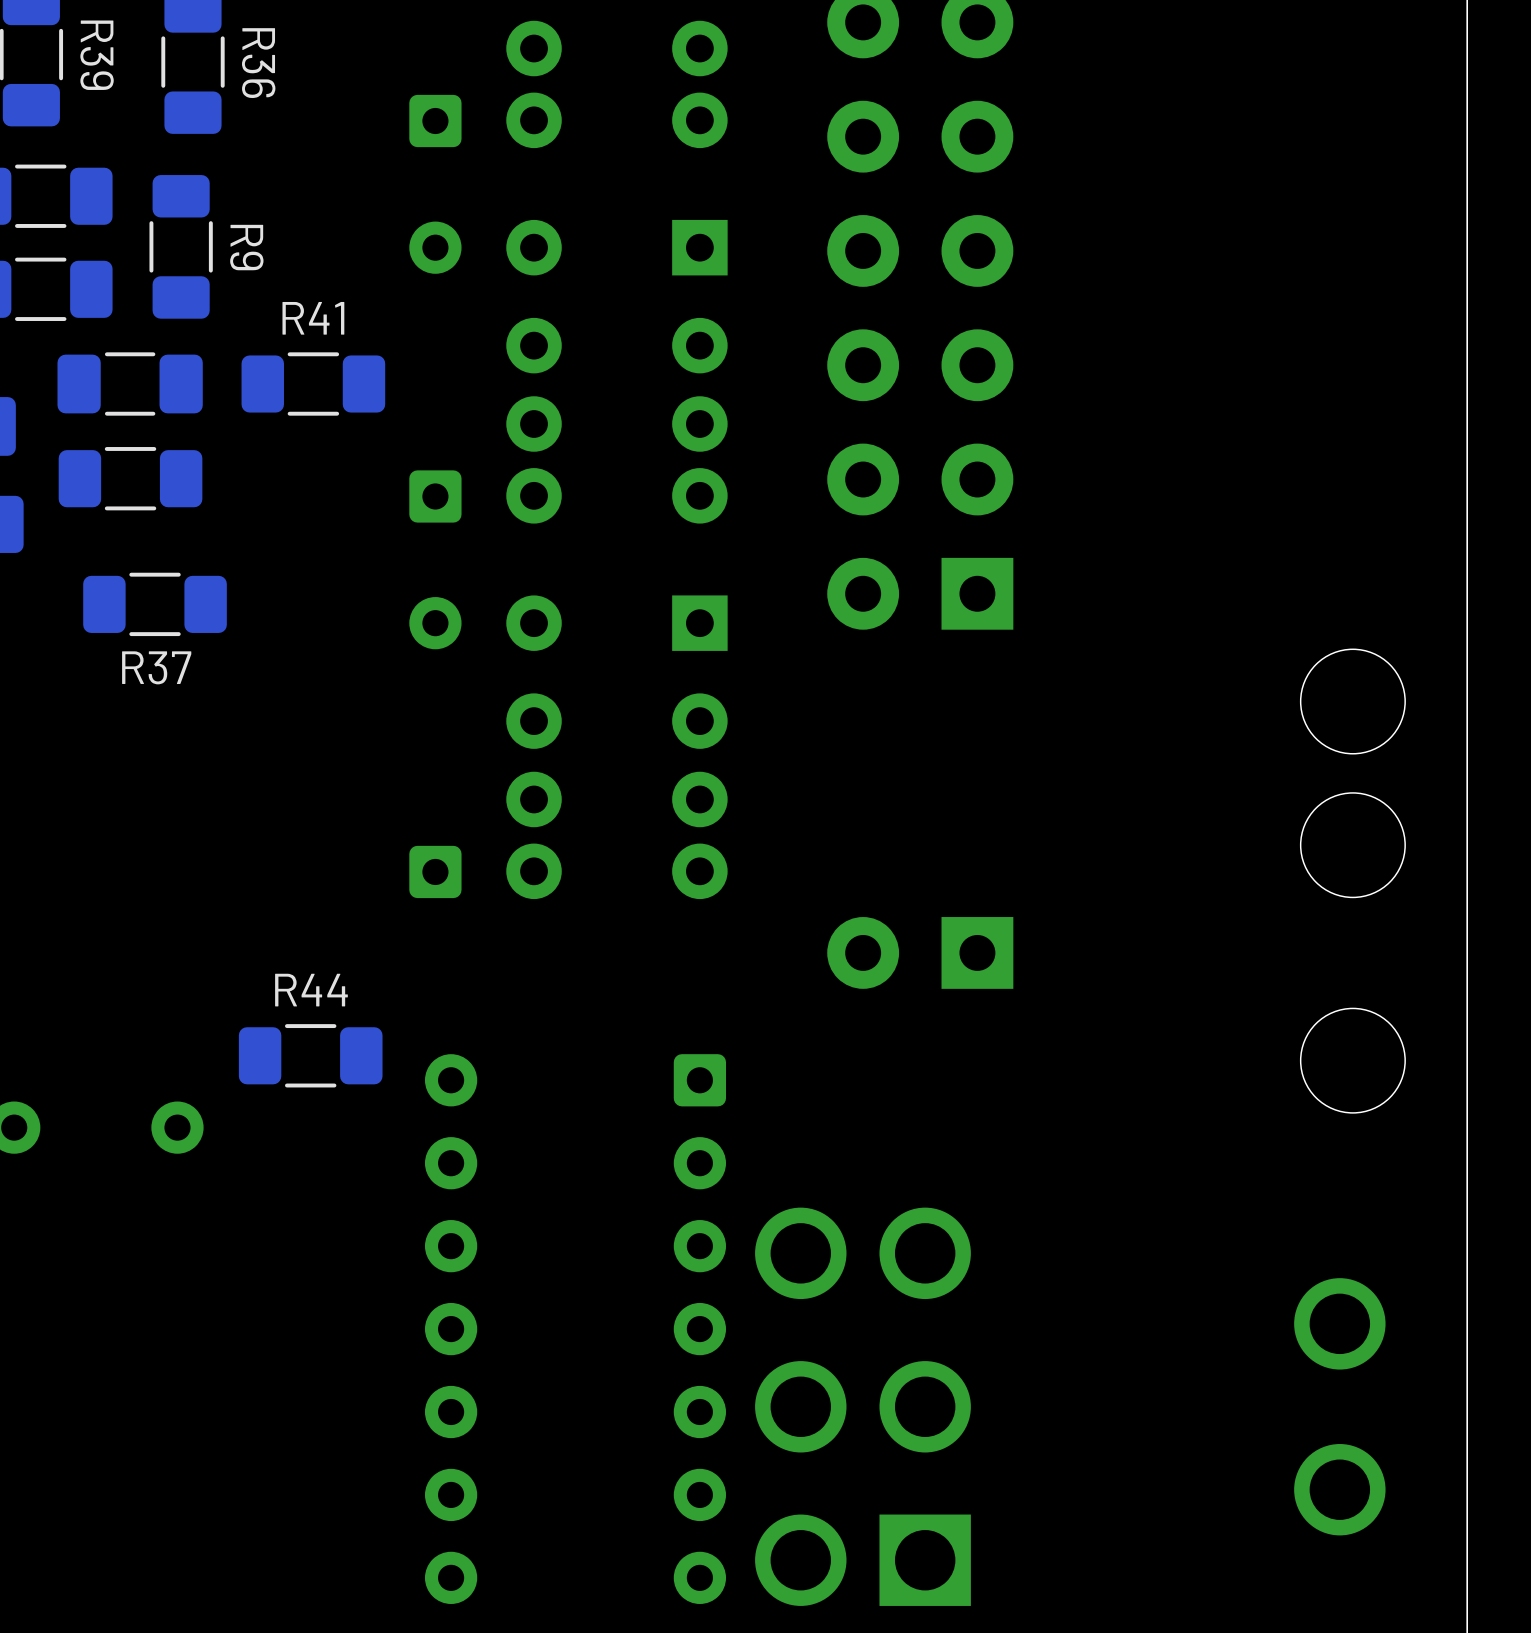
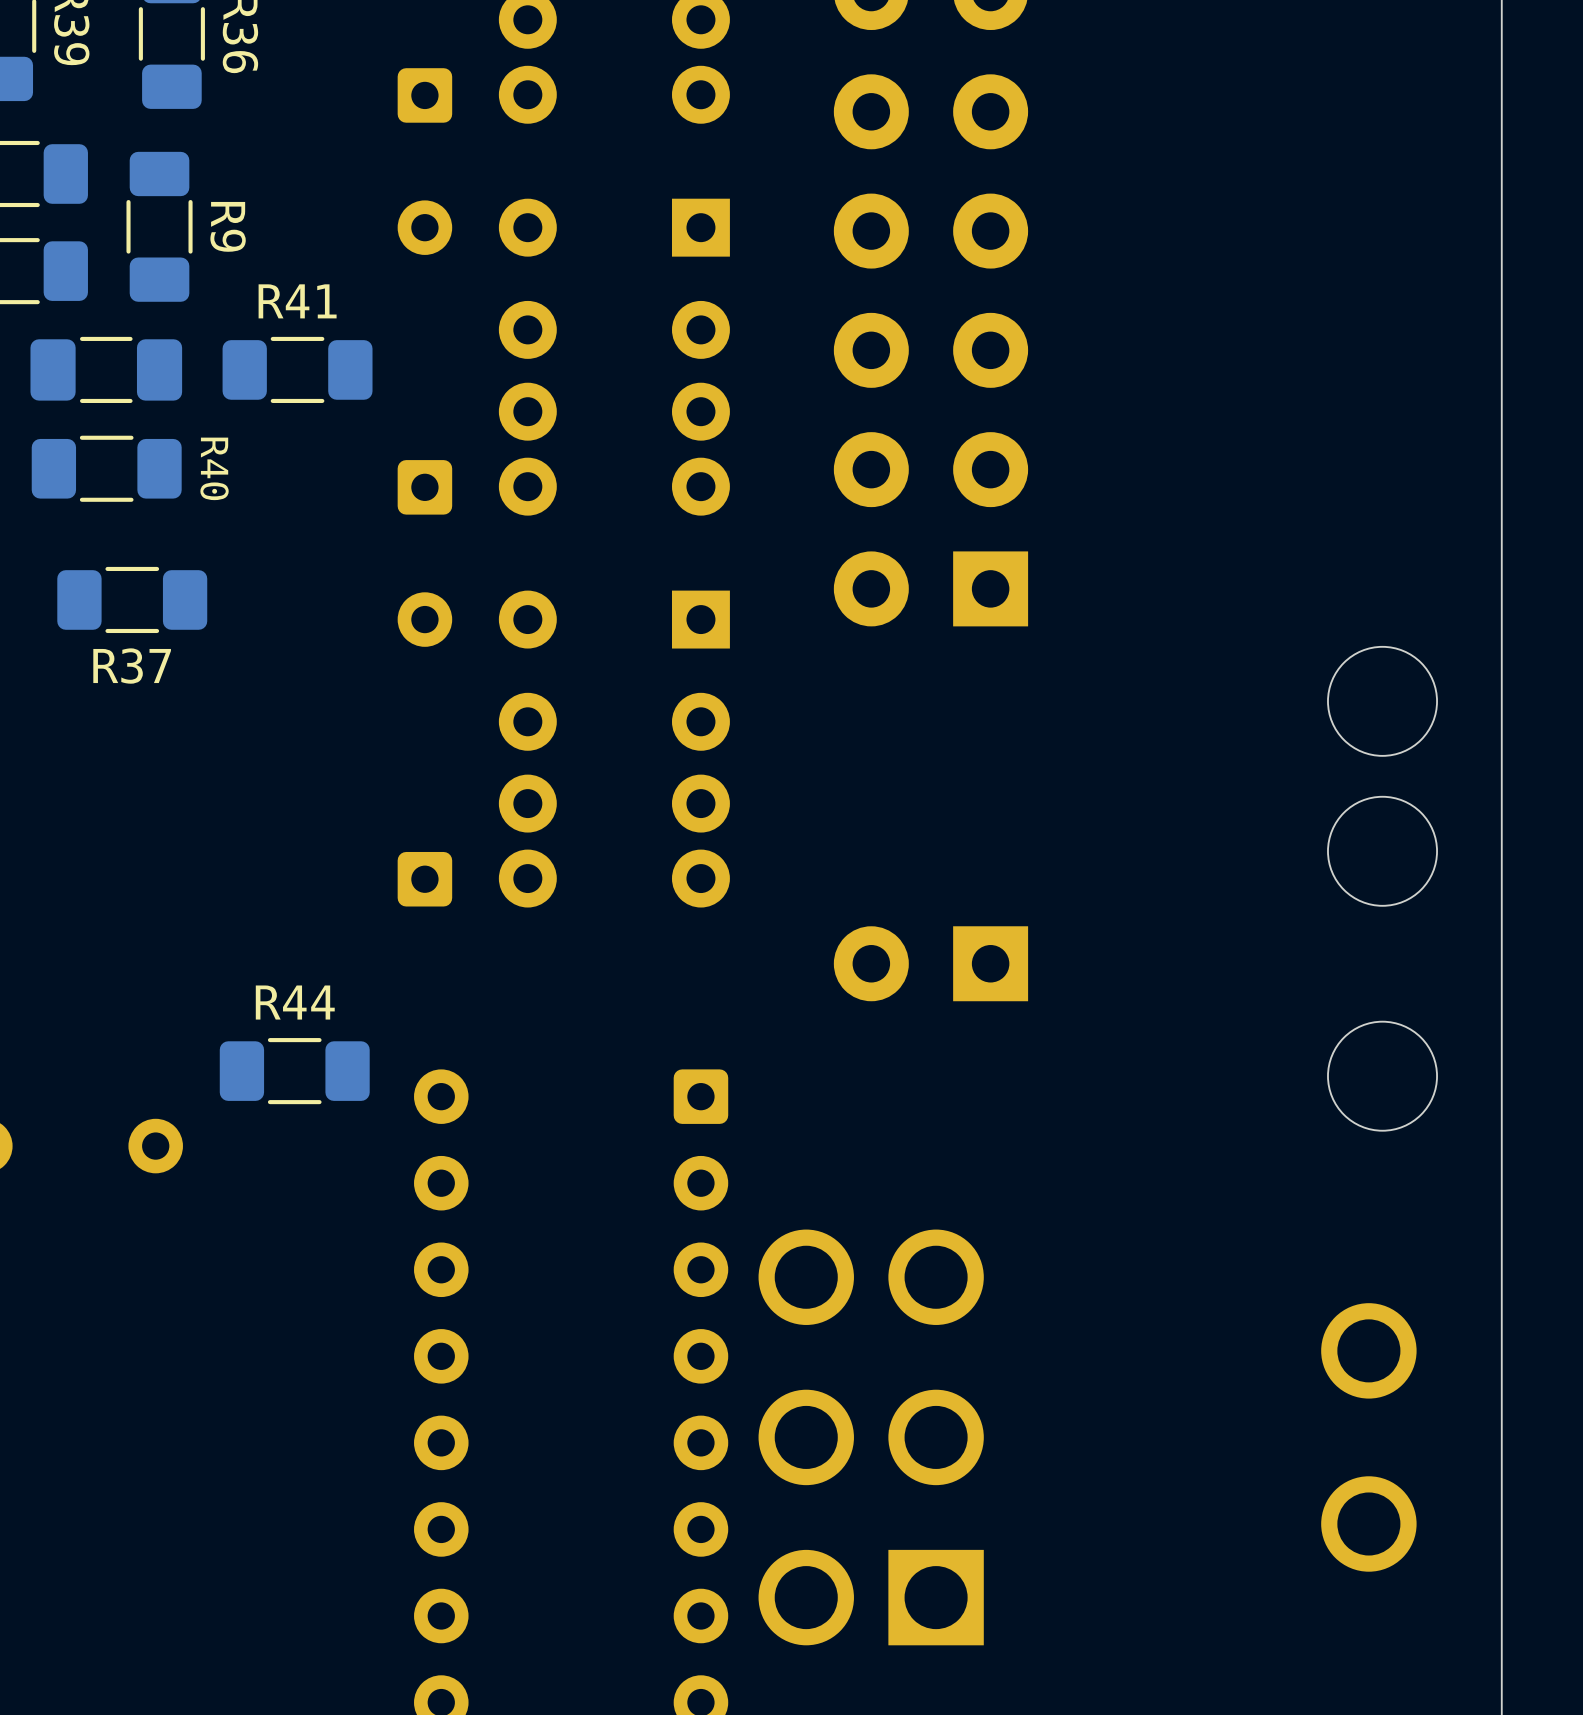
R40 name: none -> R40 (214, 468)

